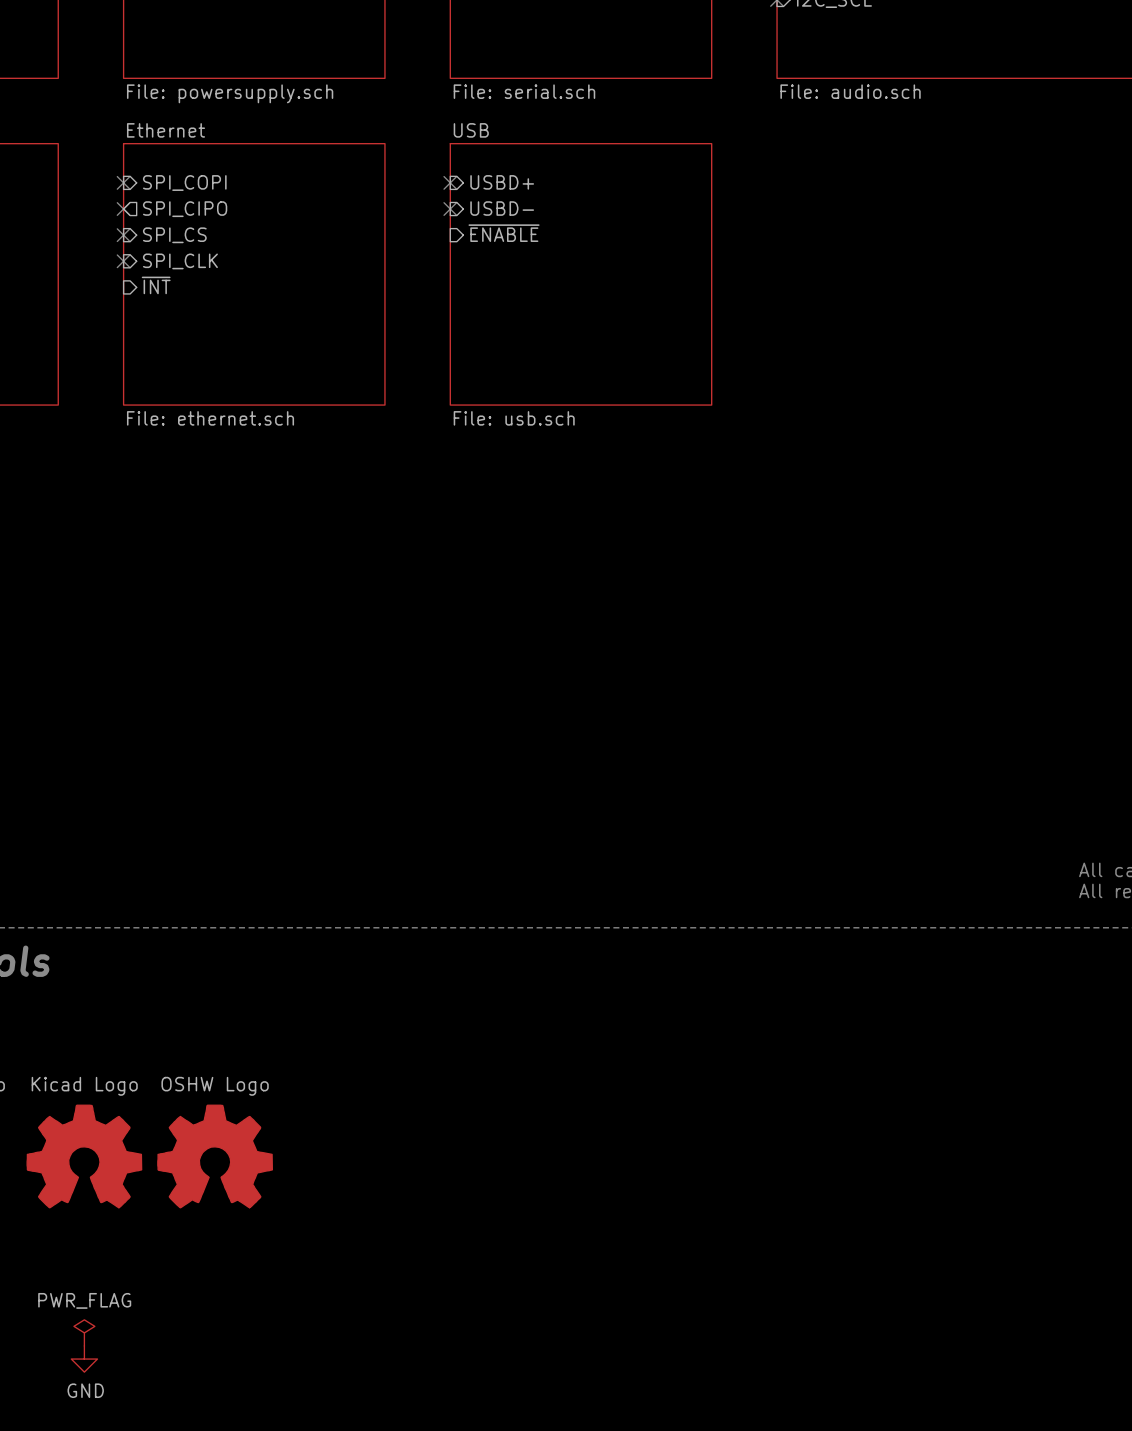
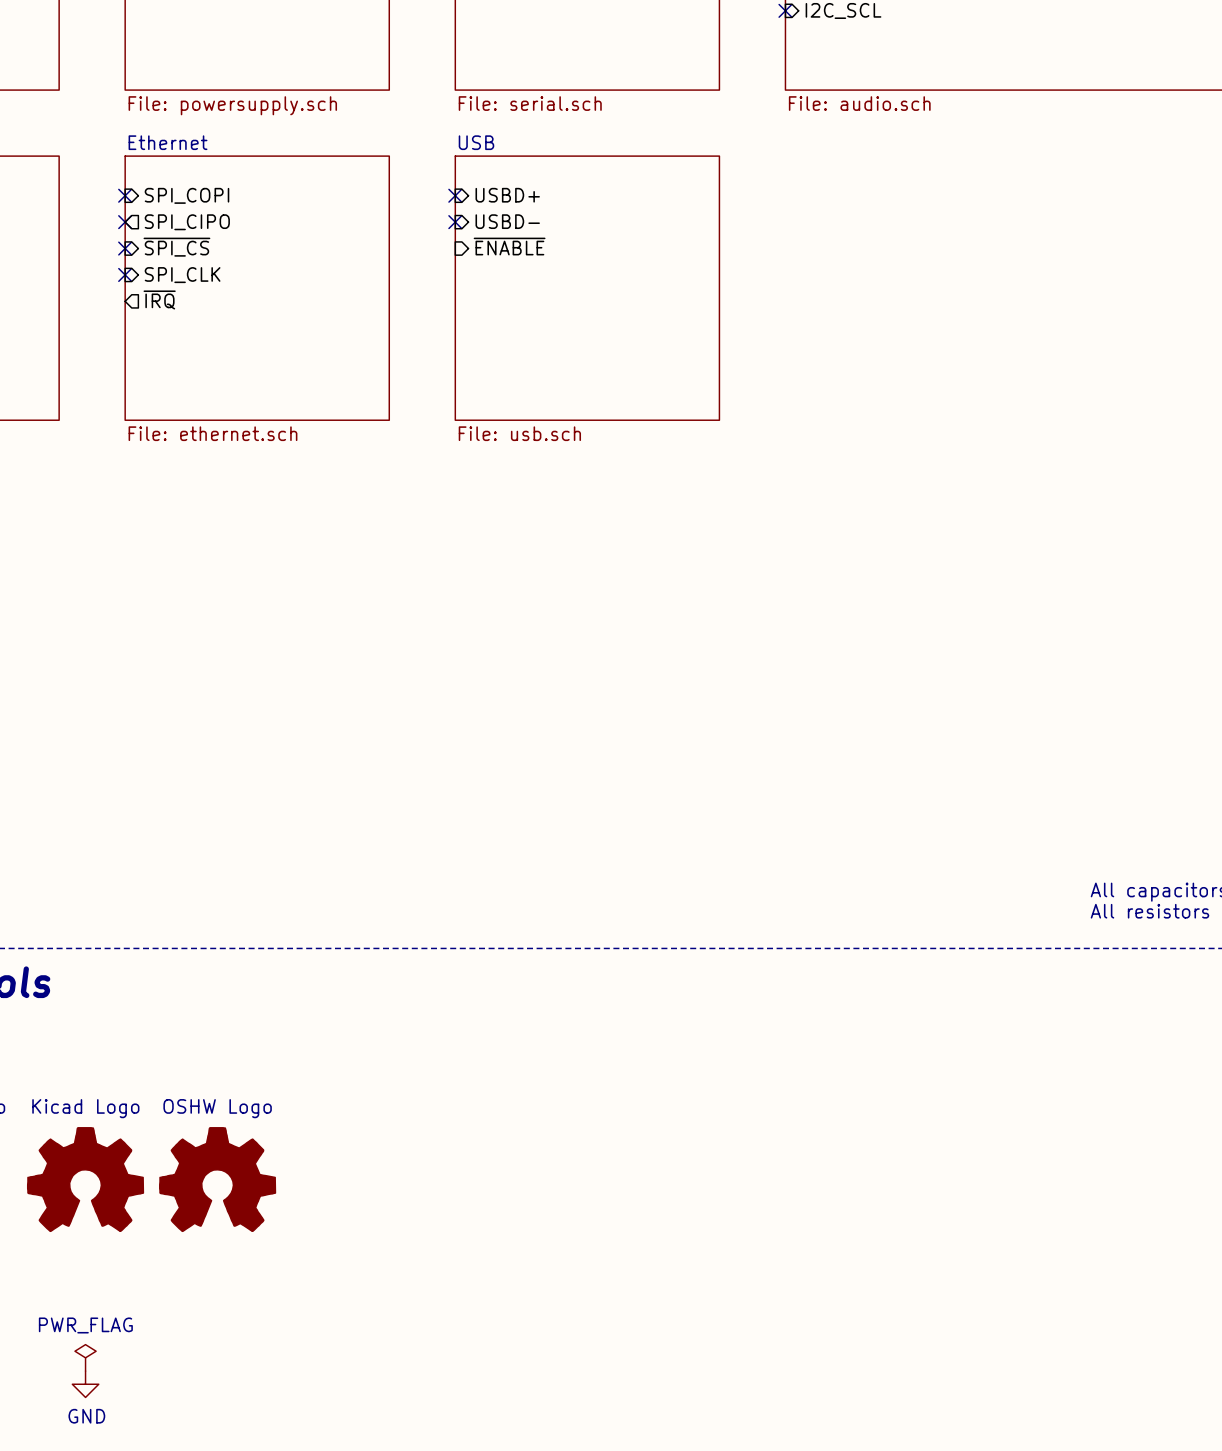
sheet pin: SPI_CS (174, 235) -> ~{SPI_CS} (176, 247)
sheet pin shape: input (156, 285) -> output (159, 299)
sheet pin: ~{INT} (156, 285) -> ~{IRQ} (159, 299)

